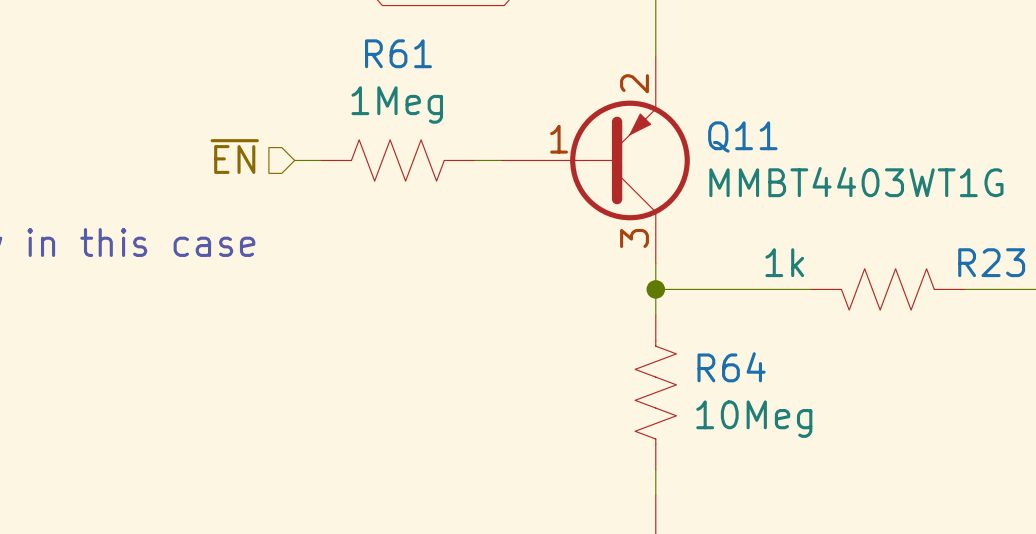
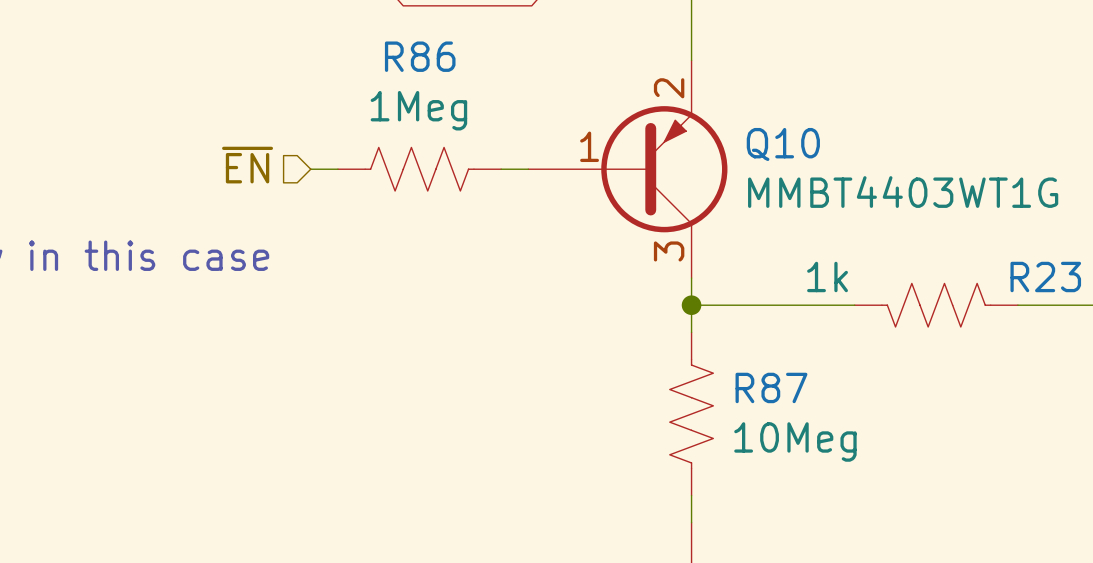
R61 name: R61 (398, 53) -> R86 (420, 56)
Q11 name: Q11 (742, 137) -> Q10 (783, 144)
R64 name: R64 (731, 367) -> R87 (771, 387)

